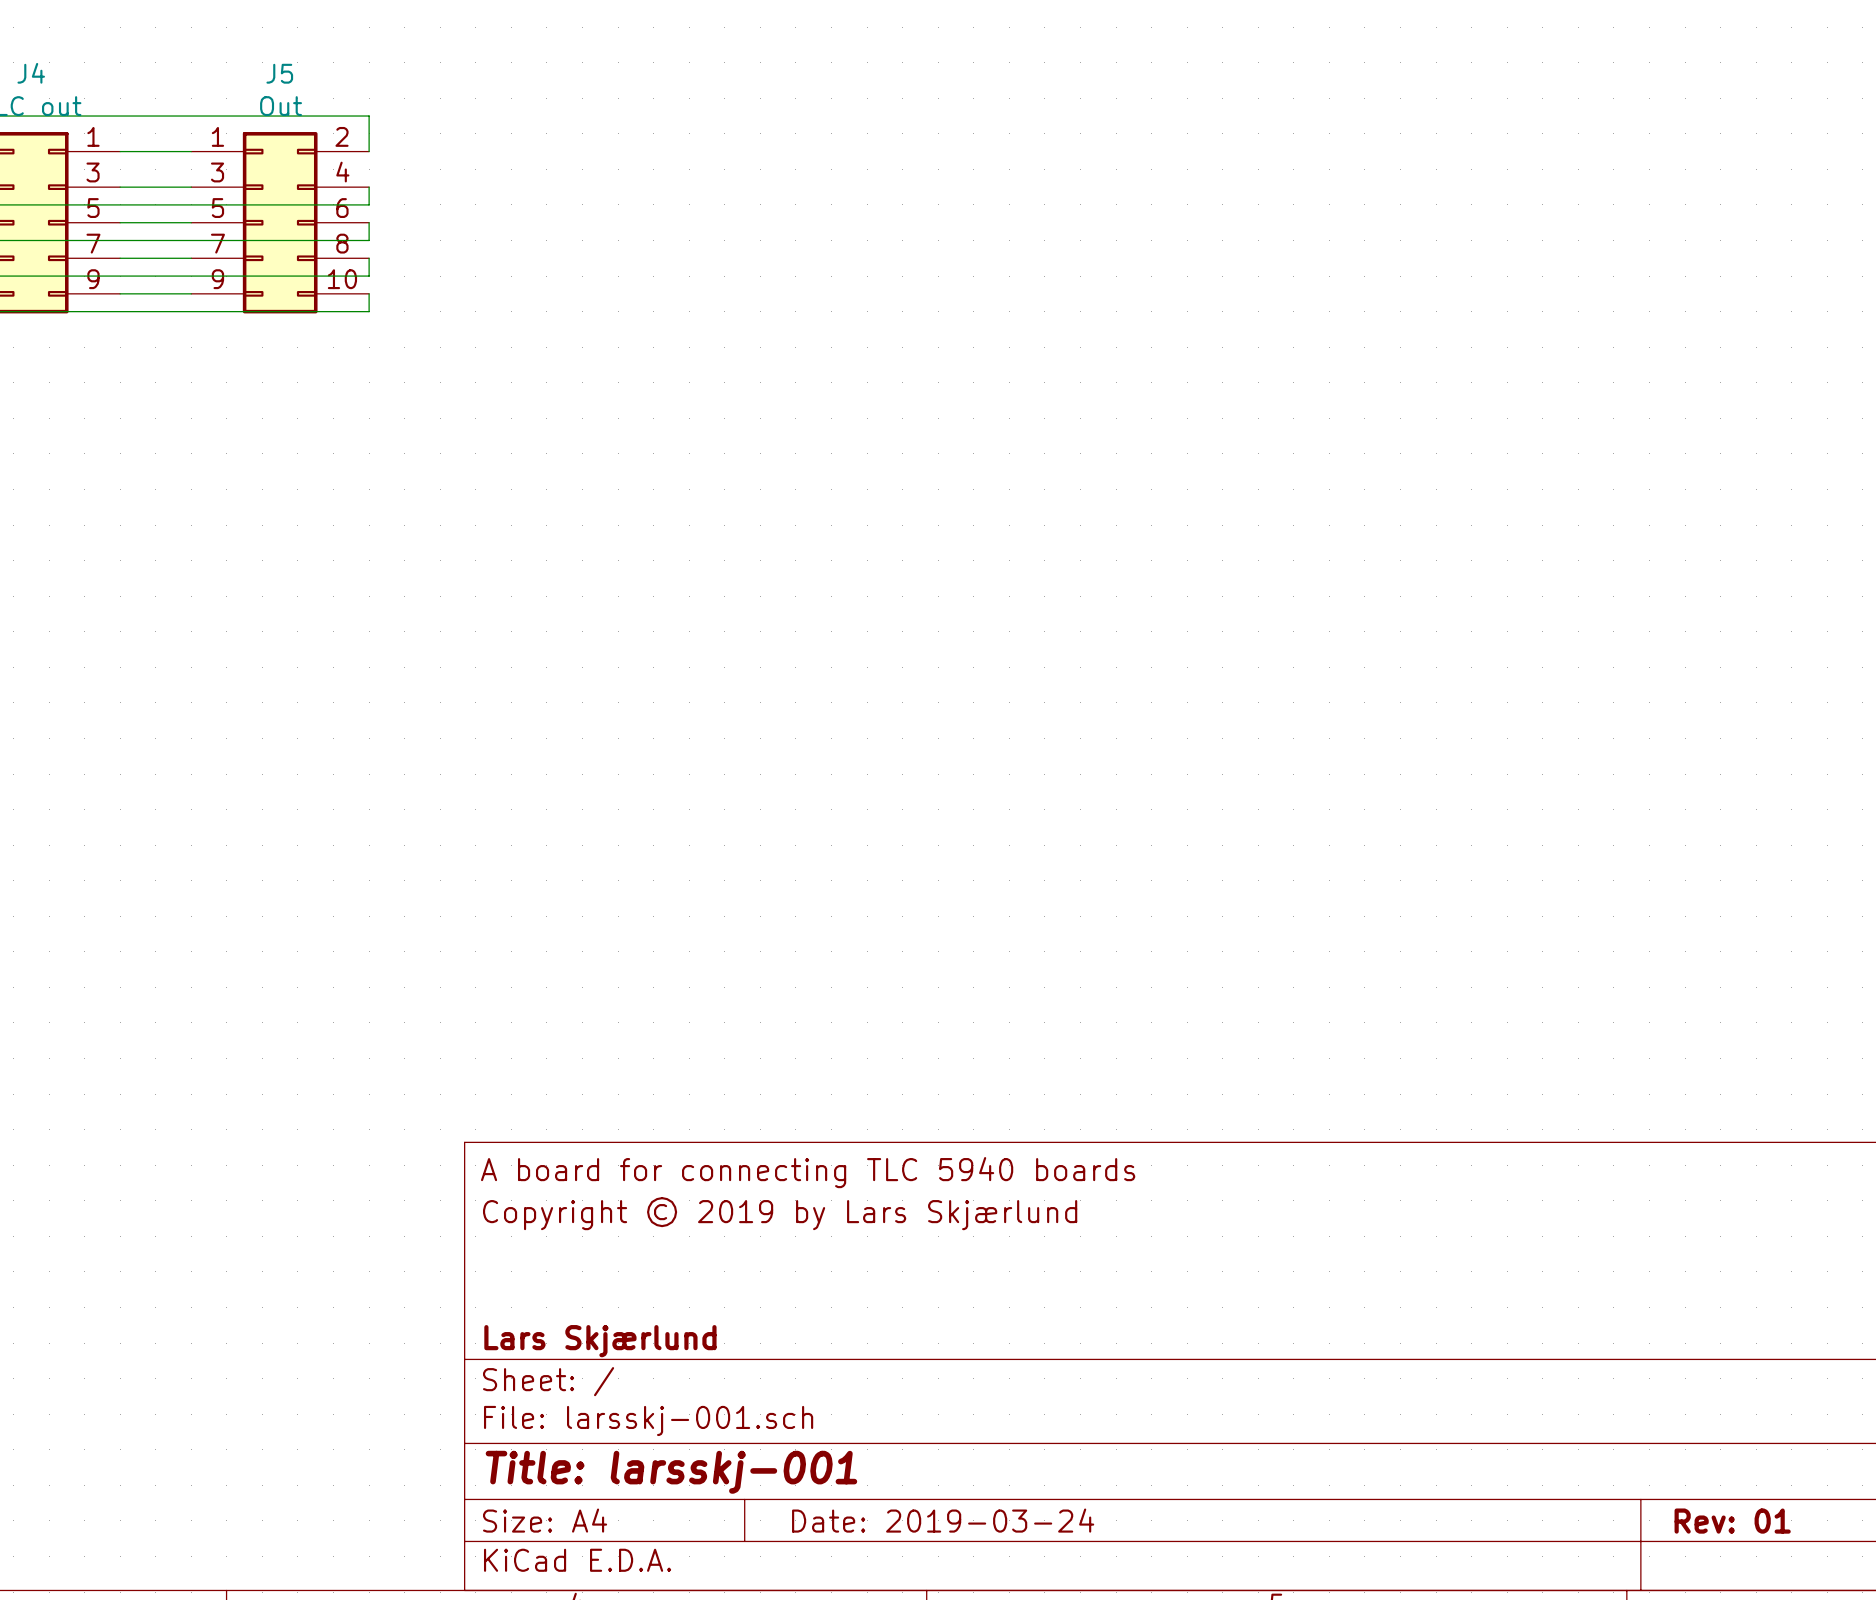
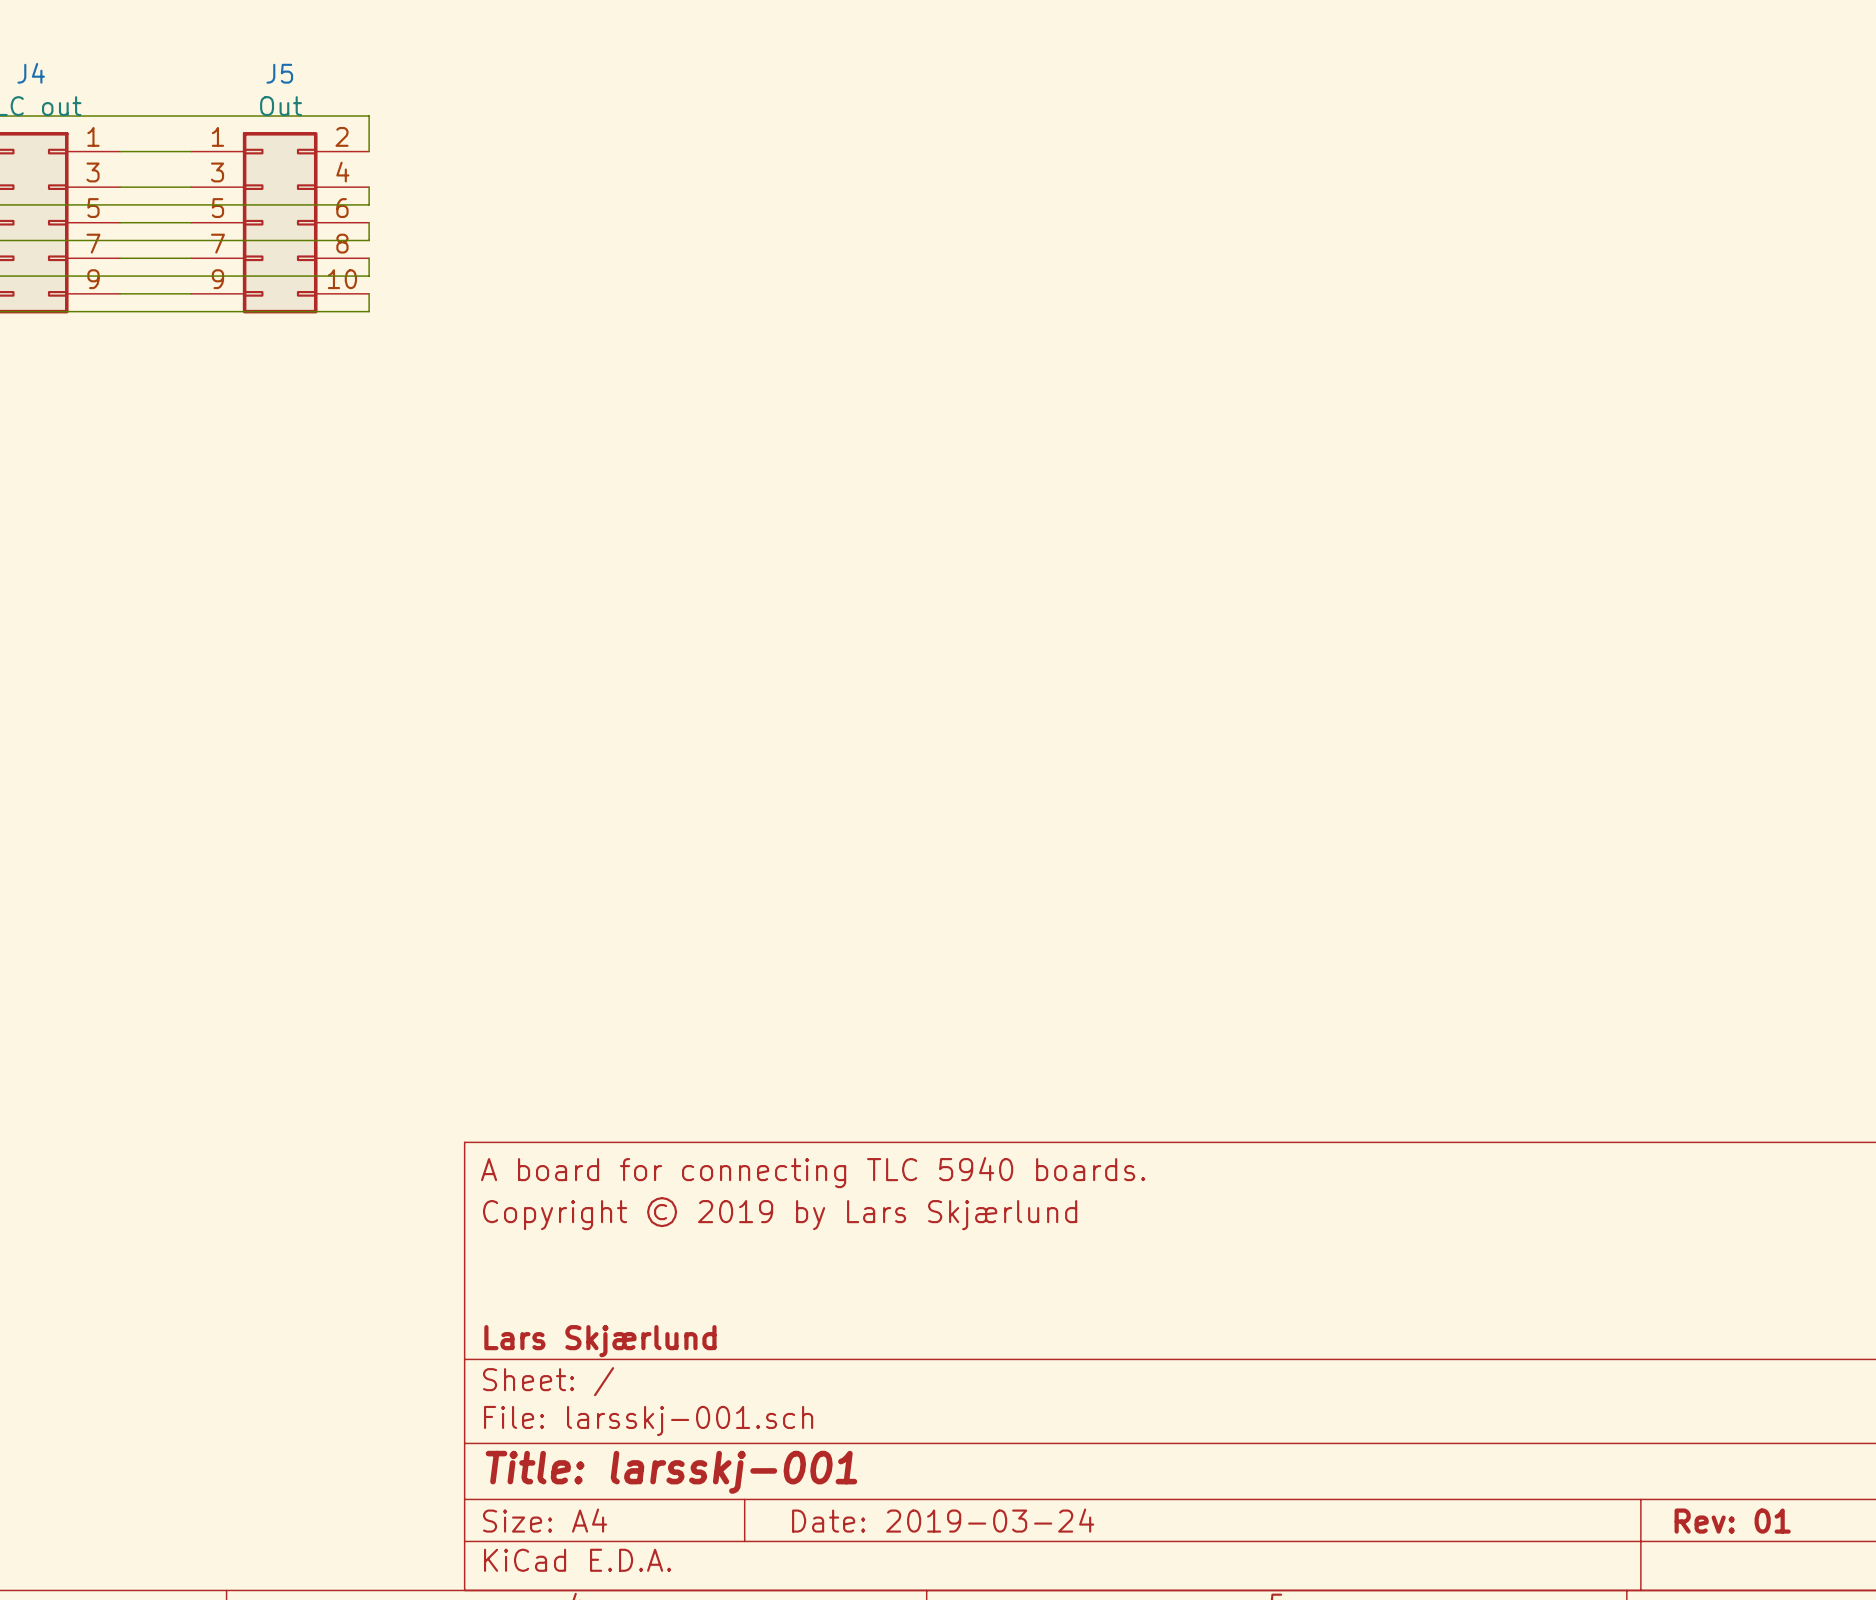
title block: A board for connecting TLC 5940 boards (808, 1172) -> A board for connecting TLC 5940 boards. (813, 1172)

